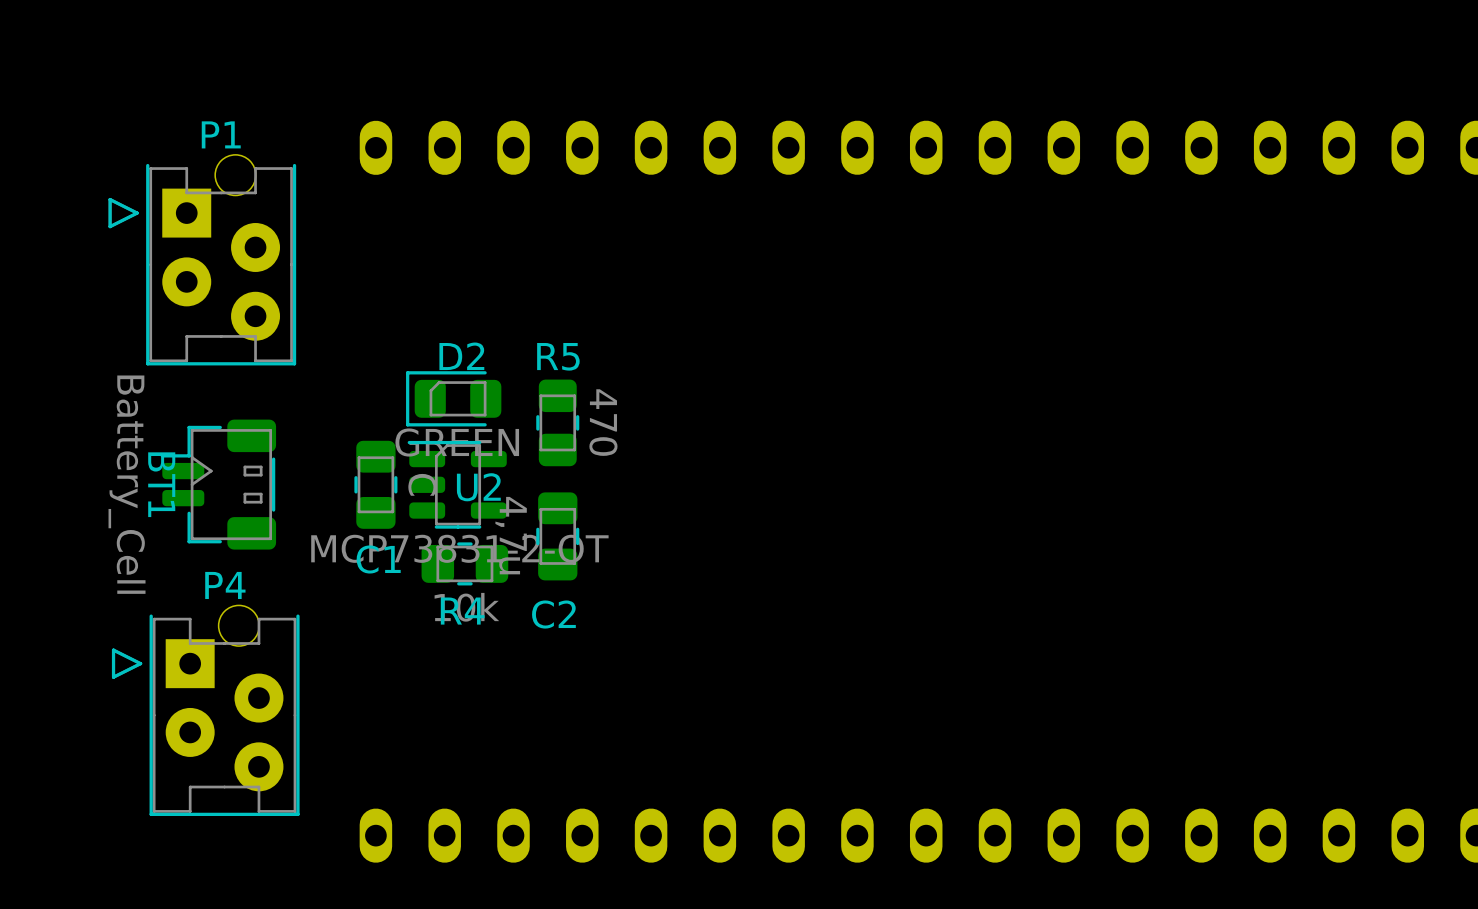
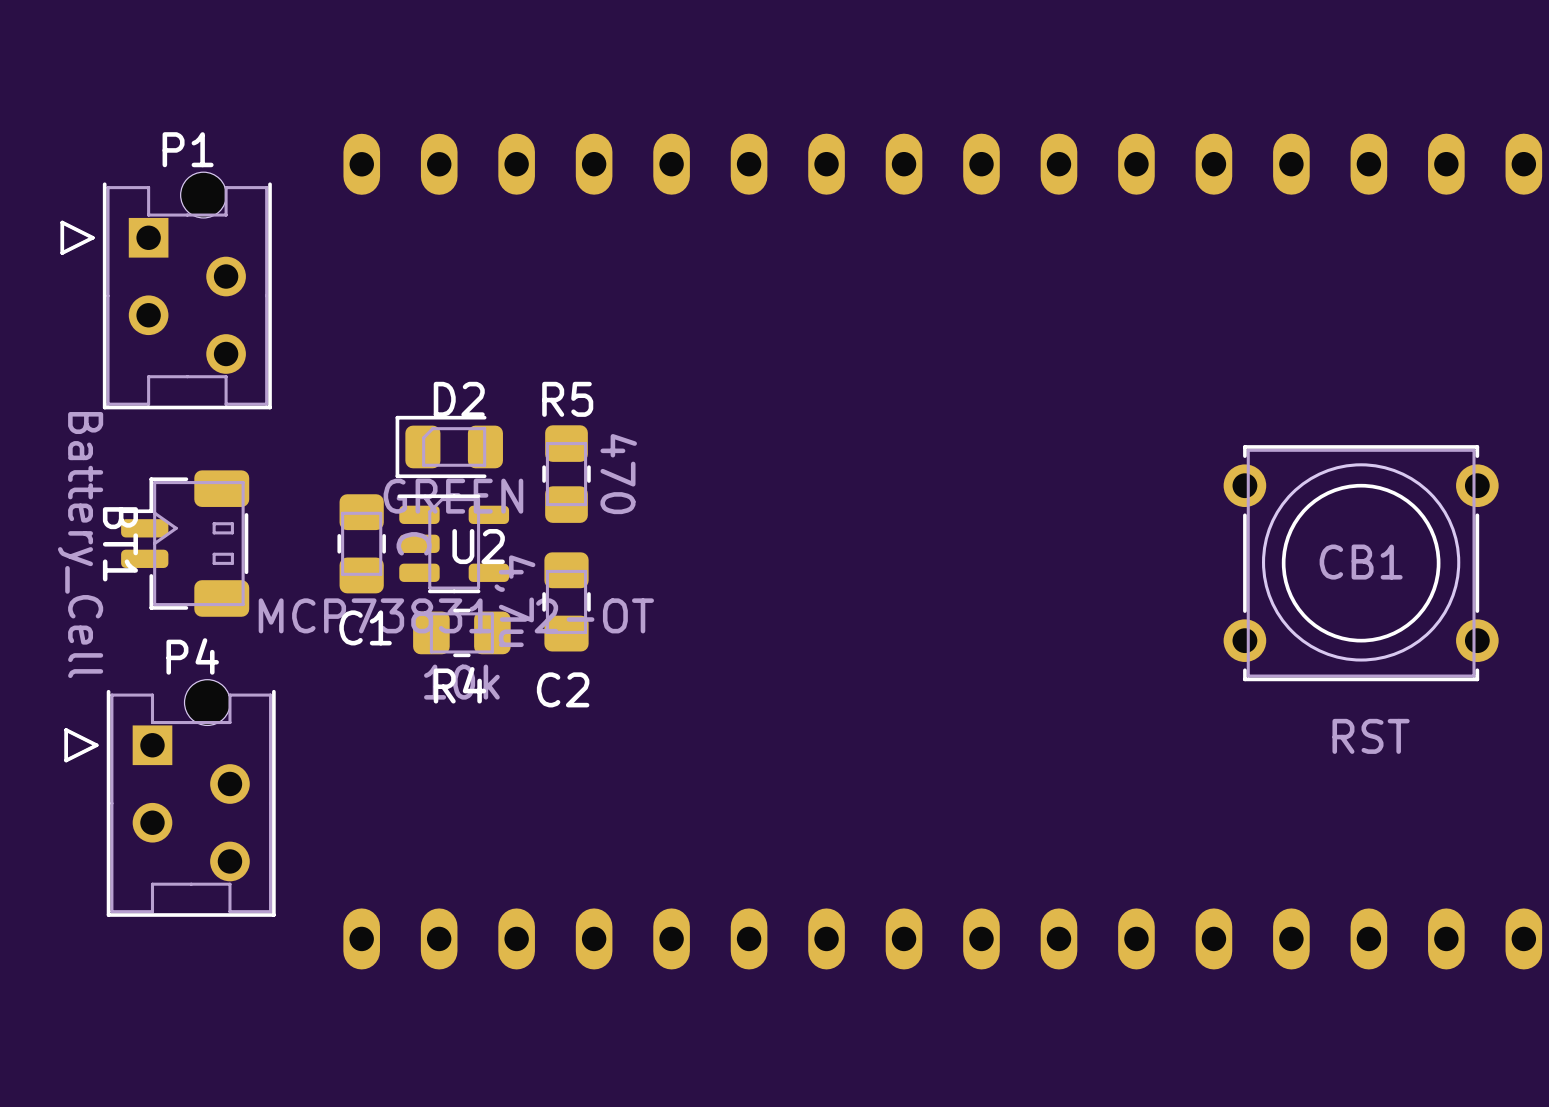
P1 footprint: [108, 154, 297, 366] -> [60, 172, 272, 410]
round board edge: none -> [1262, 463, 1461, 662]
CB1: none -> RST (1361, 563)
P4 footprint: [111, 605, 300, 817] -> [64, 679, 276, 917]

